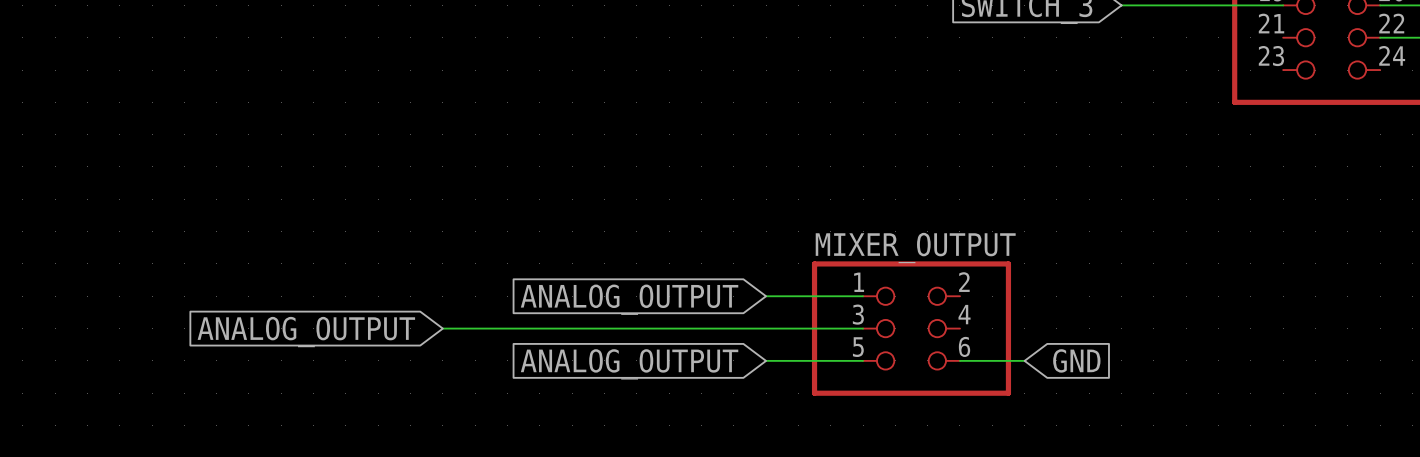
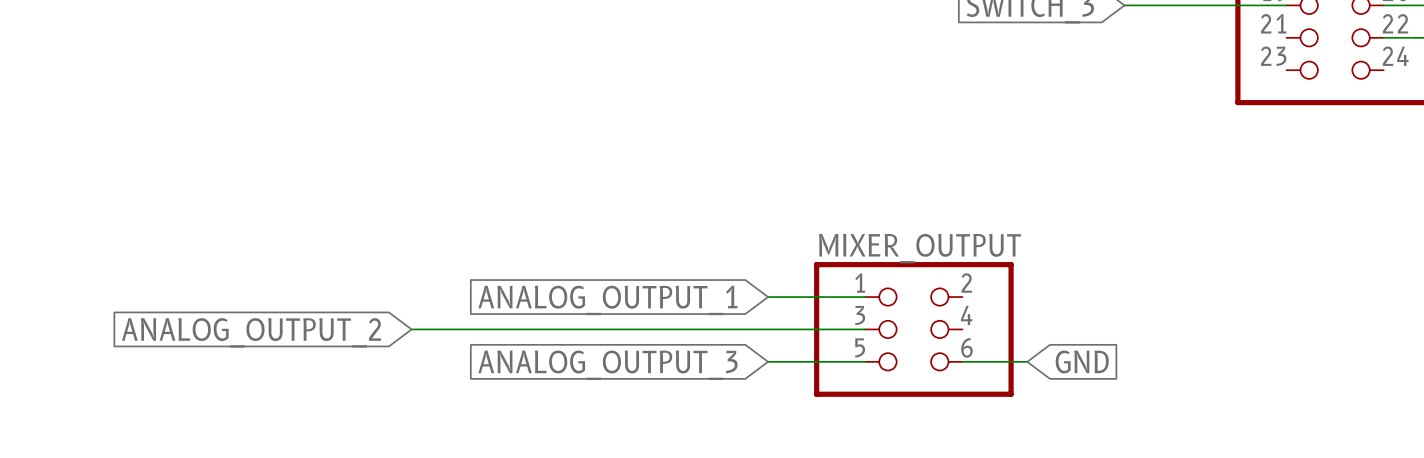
global label: ANALOG_OUTPUT (629, 299) -> ANALOG_OUTPUT_1 (607, 300)
wire: none -> (411, 329) (444, 329)
global label: ANALOG_OUTPUT (306, 332) -> ANALOG_OUTPUT_2 (251, 332)
global label: ANALOG_OUTPUT (629, 364) -> ANALOG_OUTPUT_3 (608, 365)

